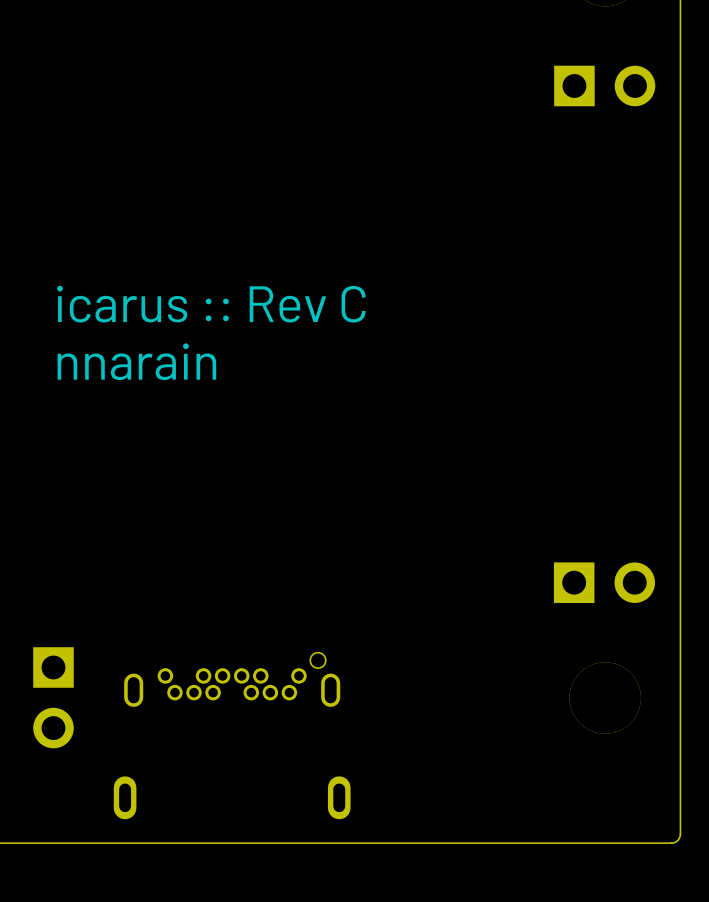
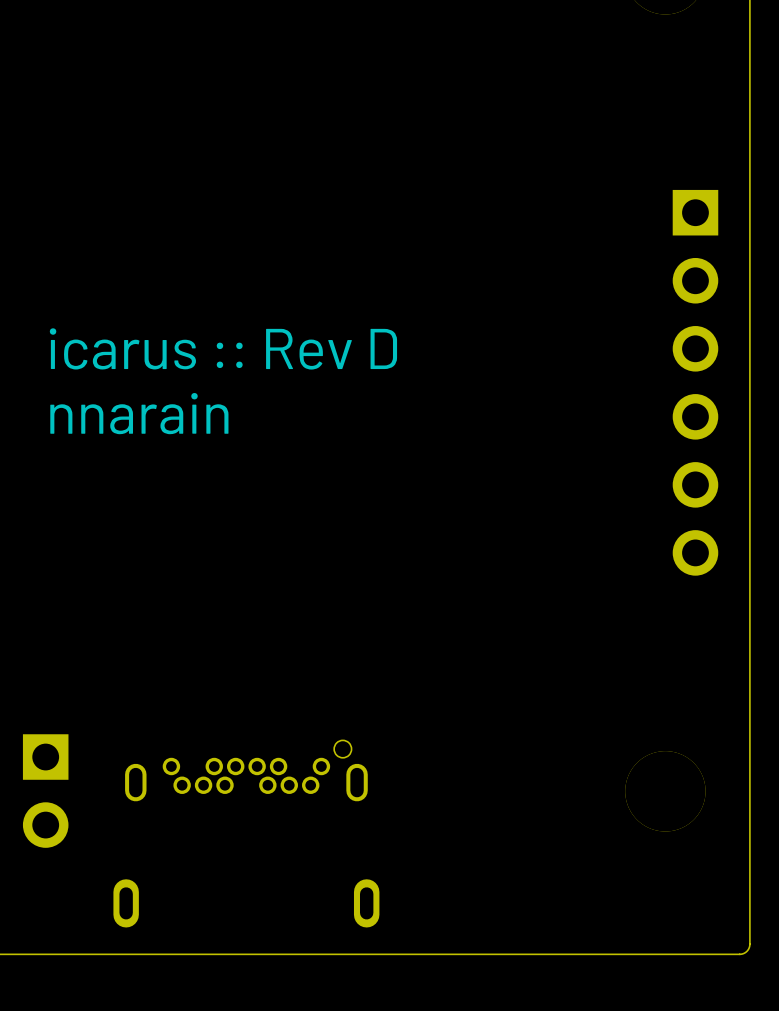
part: (604, 85) -> none
text: icarus :: Rev C (211, 304) -> icarus :: Rev D (223, 348)
part: none -> (695, 382)
part: (604, 582) -> none

